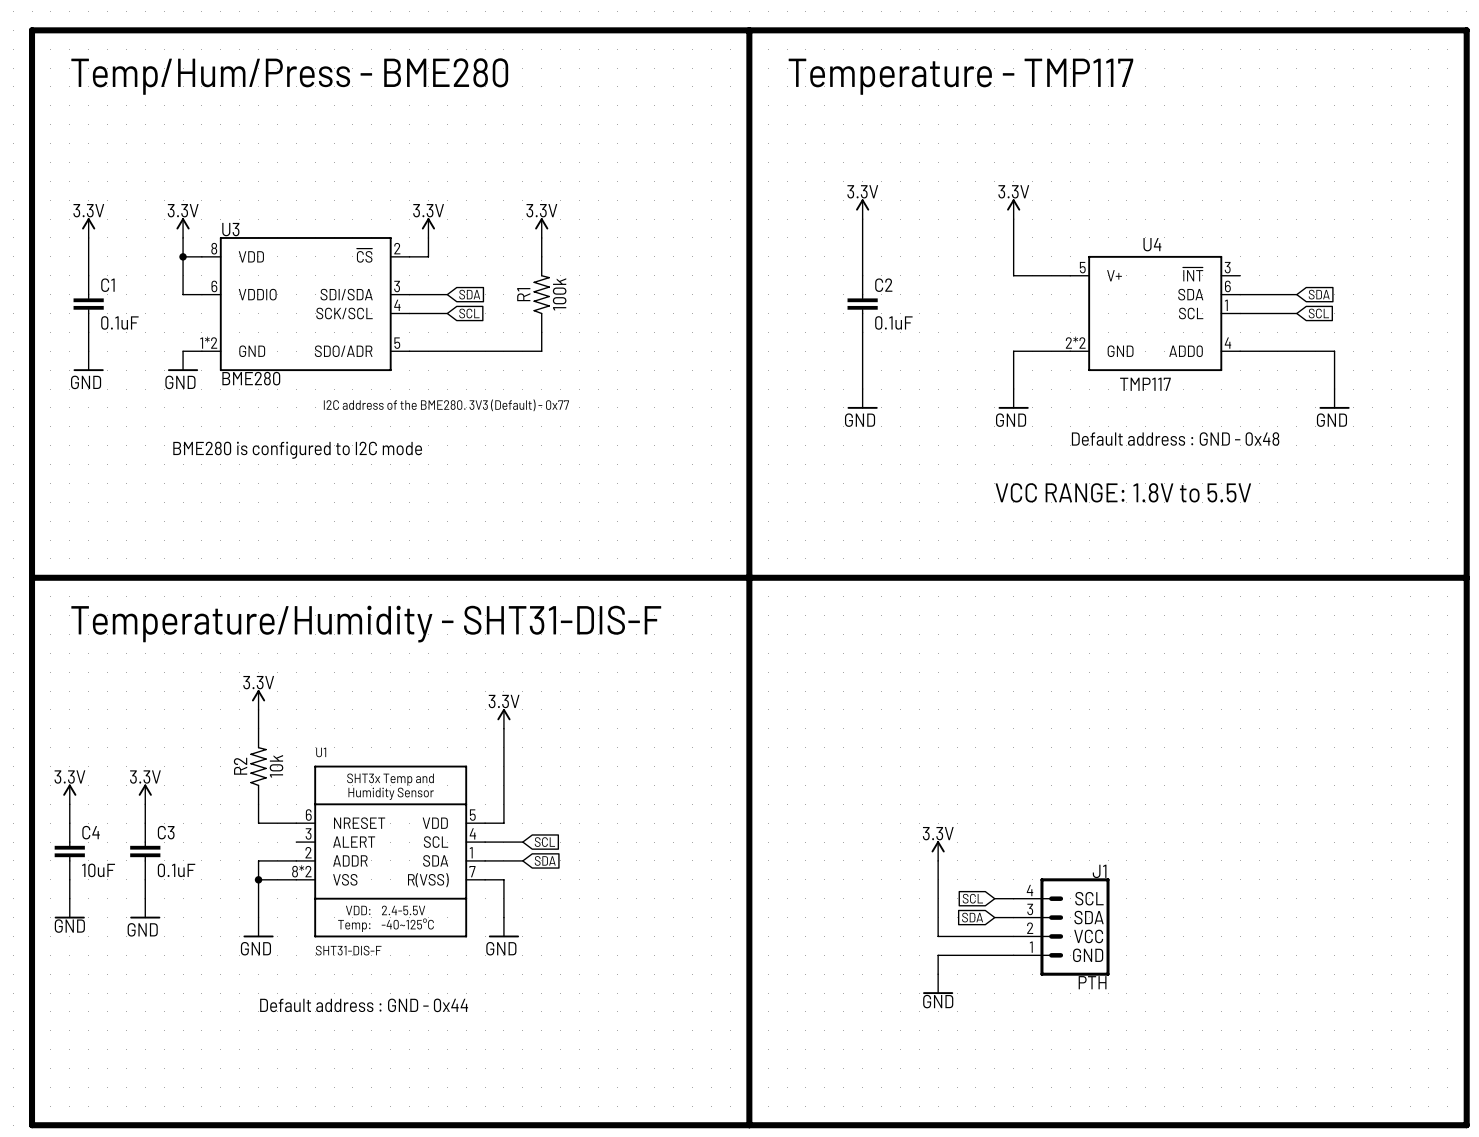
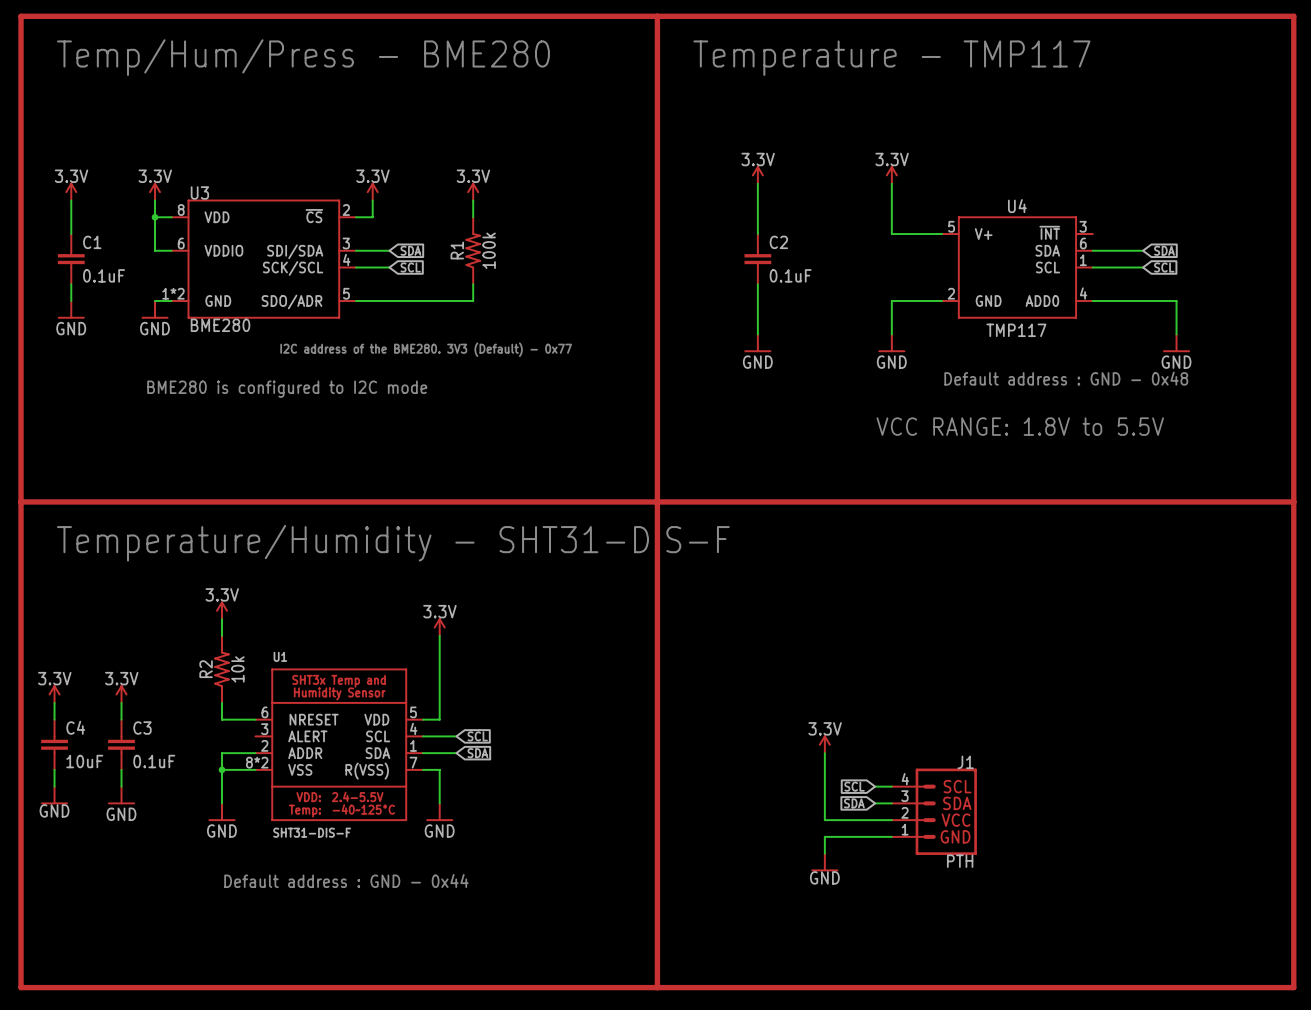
U4 pin number: 2*2 (1075, 342) -> 2 (951, 293)

